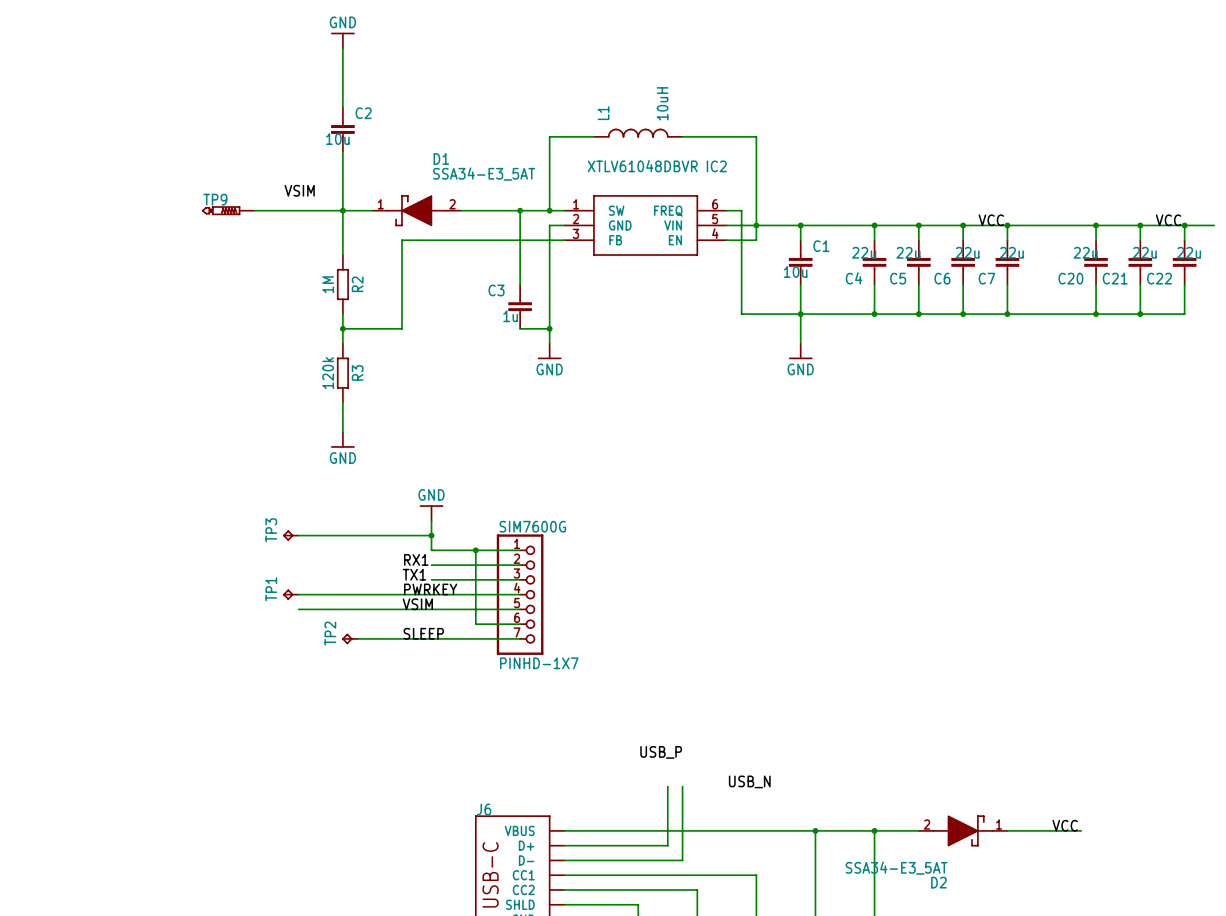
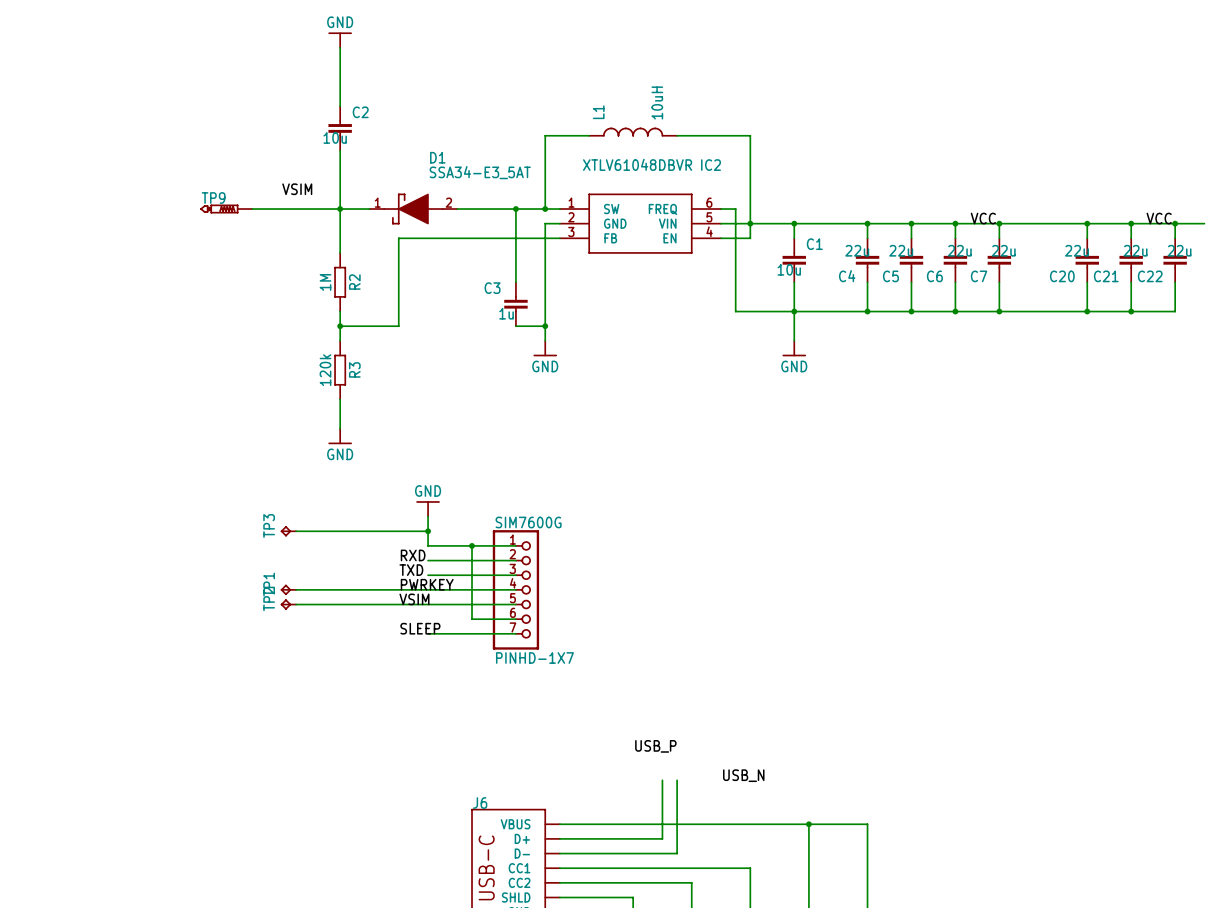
label: RX1 (416, 559) -> RXD (413, 555)
label: TX1 (414, 574) -> TXD (411, 570)
TP2 position: (349, 638) -> (288, 604)
wire: (357, 638) (431, 638) -> none
label: VCC (1065, 825) -> none
wire: (874, 830) (918, 830) -> none
junction: (874, 830) -> none
D2: SSA34-E3_5AT (963, 830) -> none
wire: (1007, 830) (1081, 830) -> none

